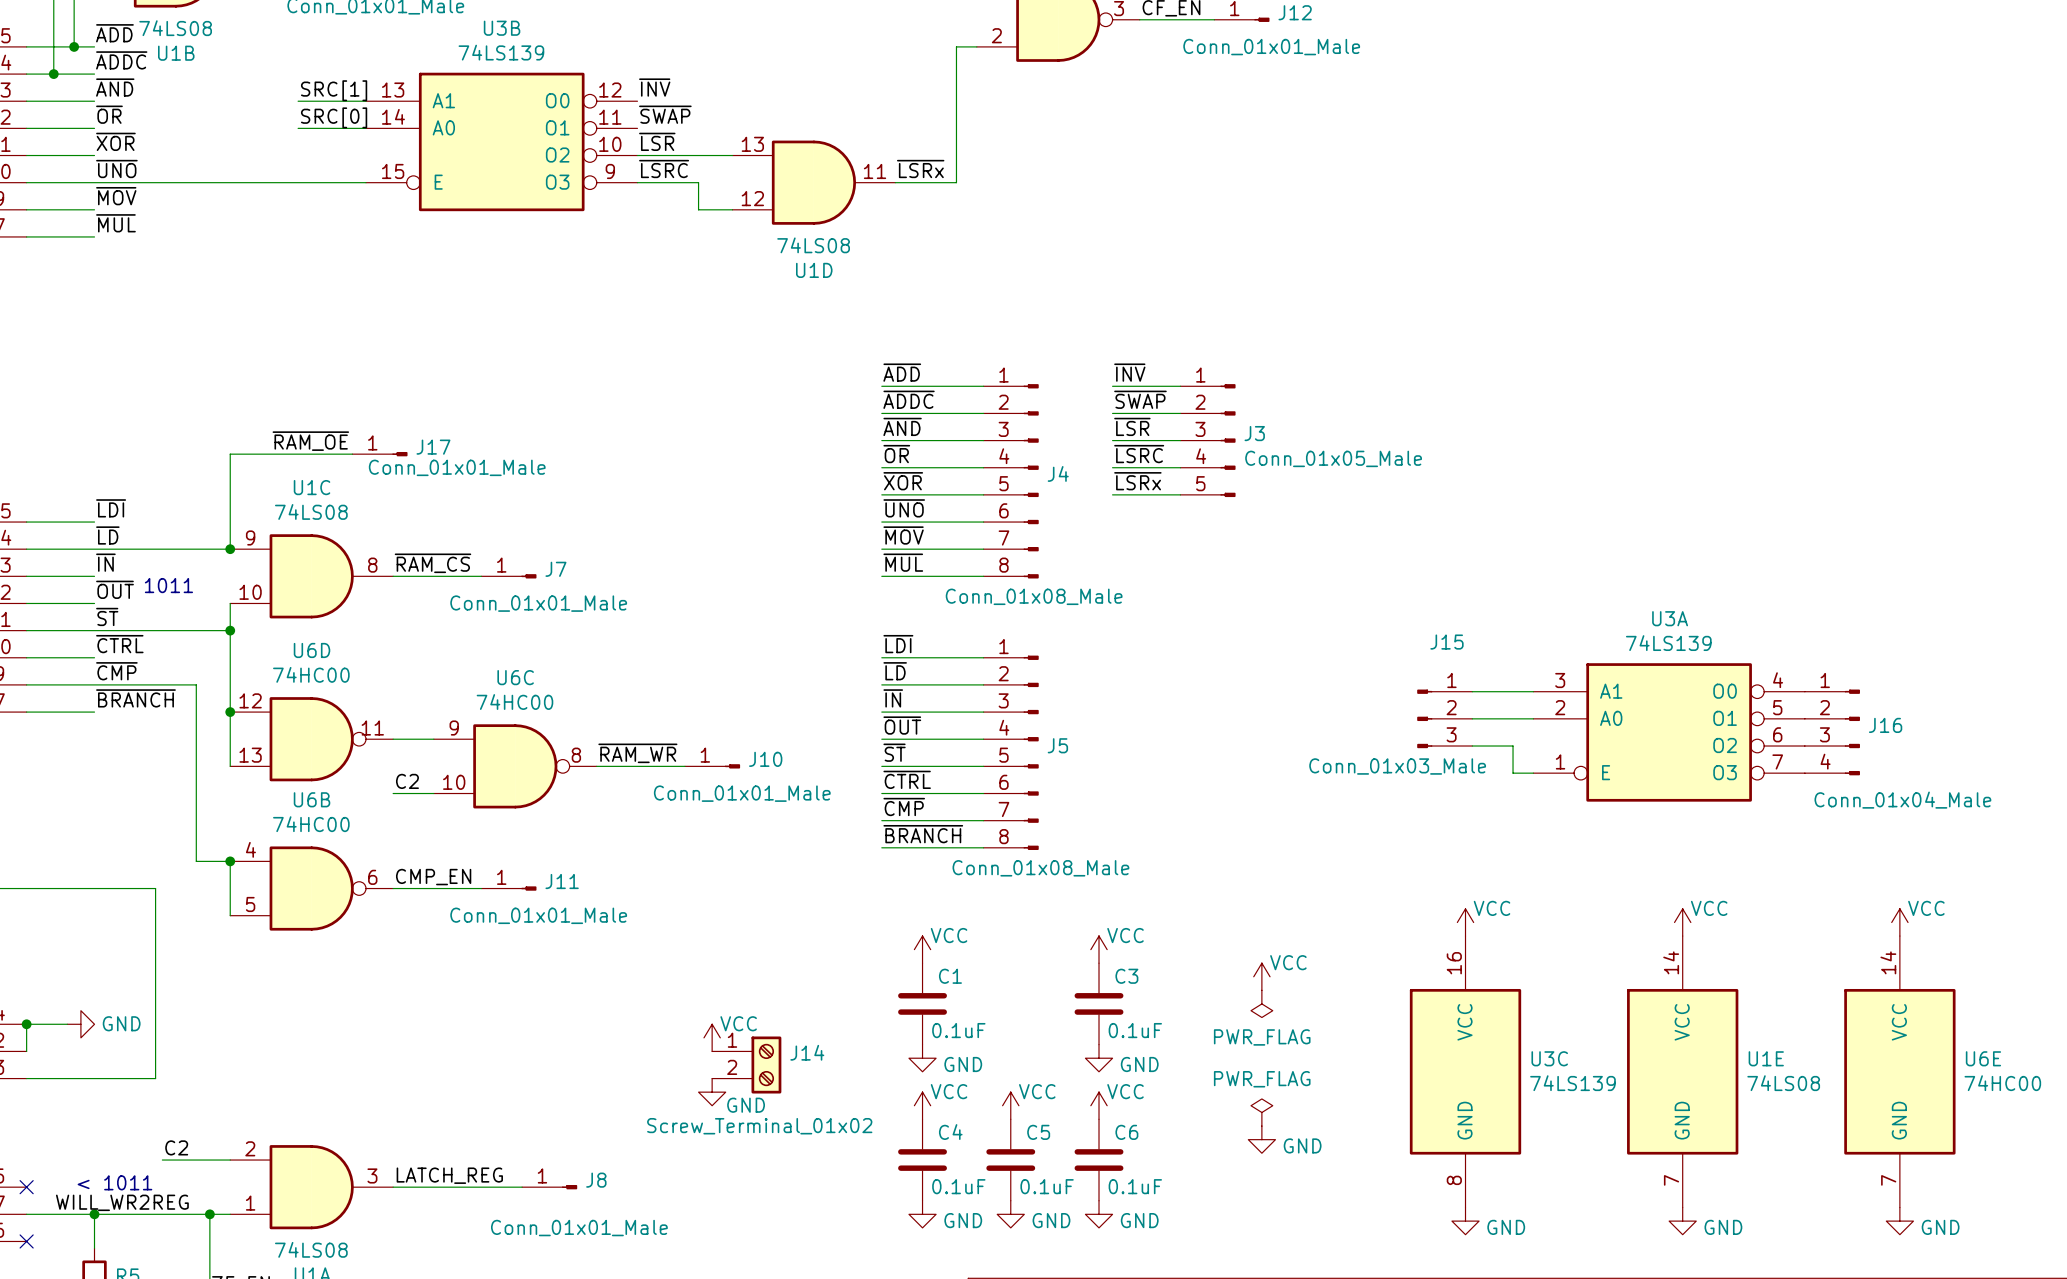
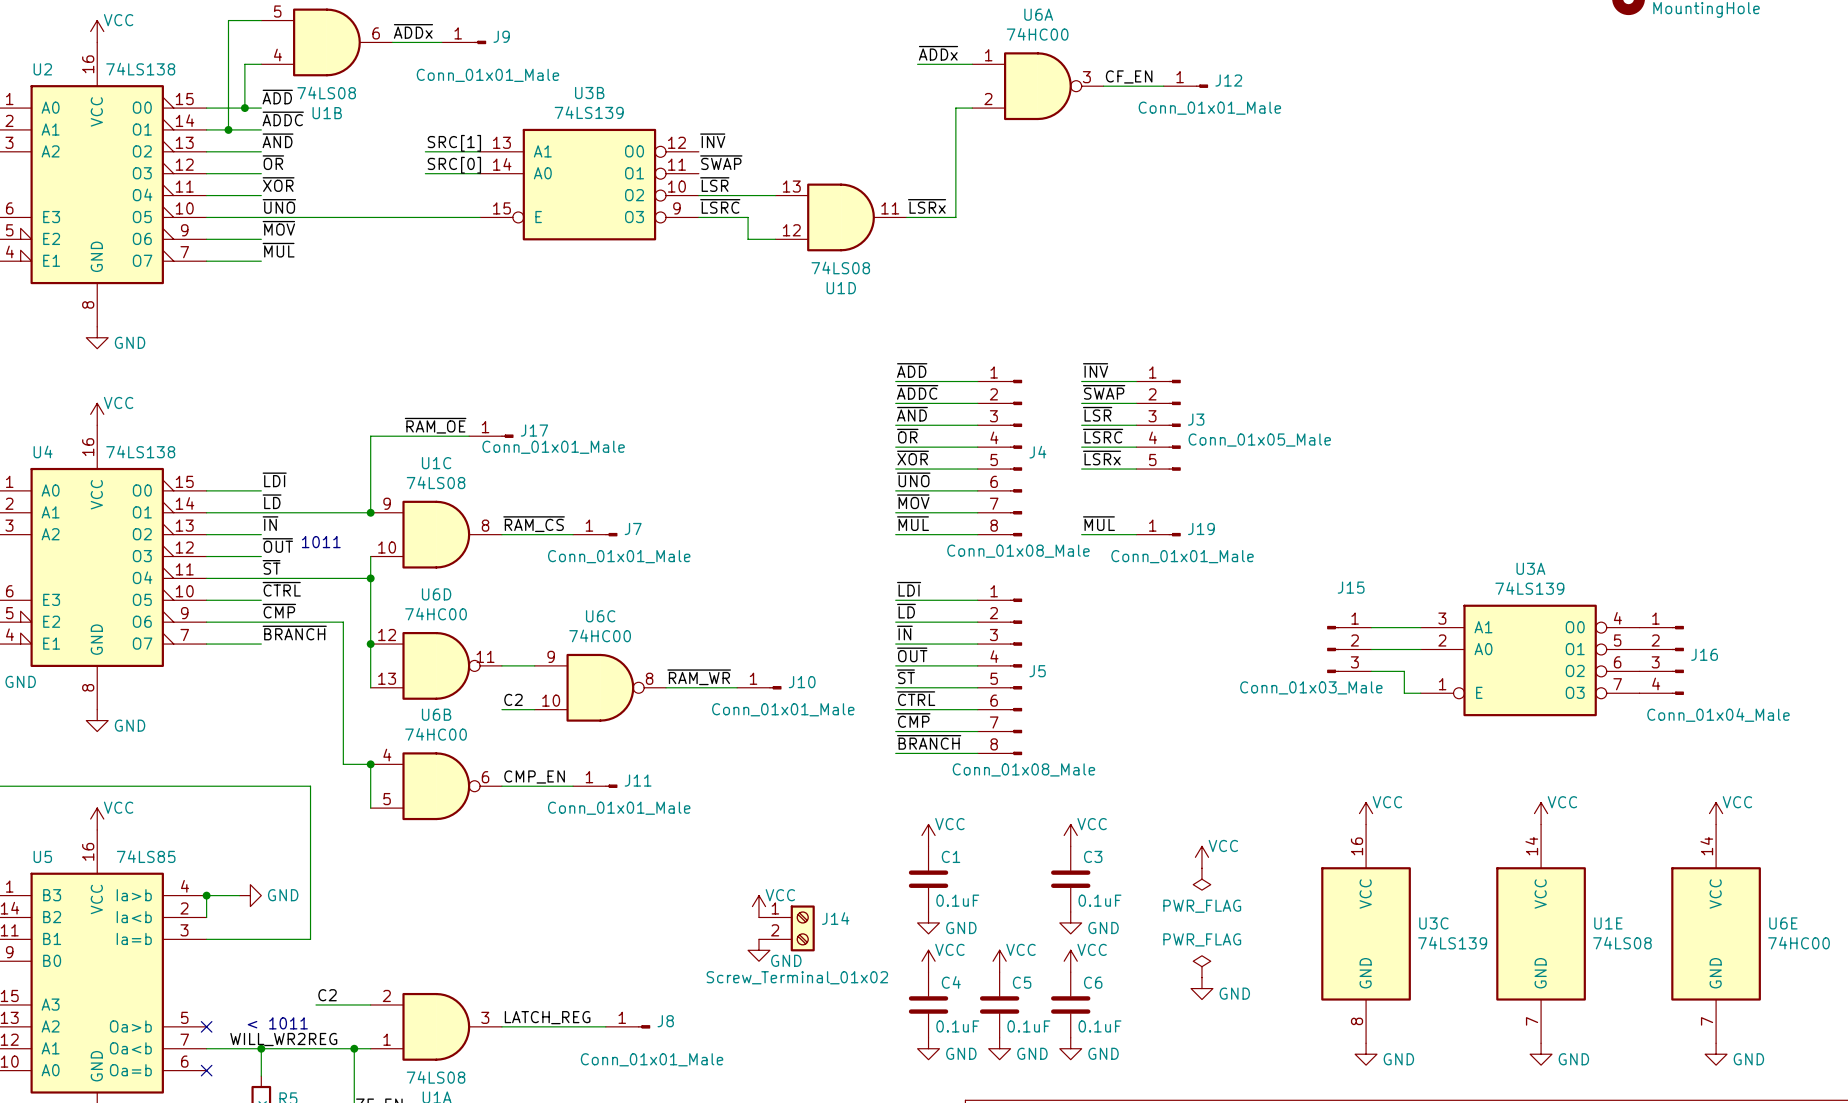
label: none -> ~{MUL} (1098, 523)
wire: none -> (1081, 534) (1136, 534)
J19: none -> Conn_01x01_Male (1158, 534)

